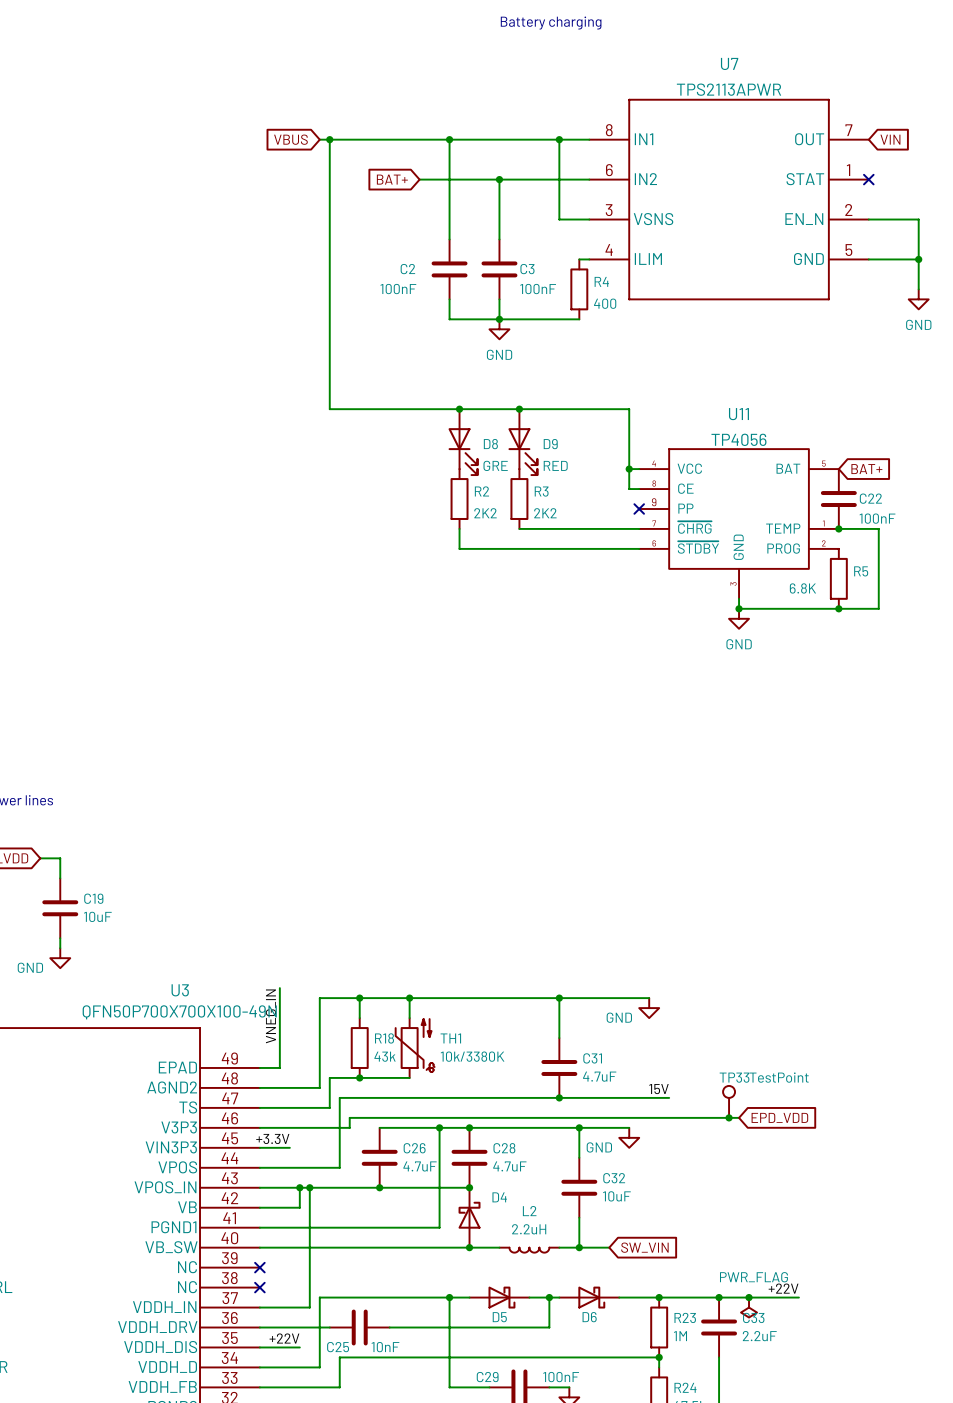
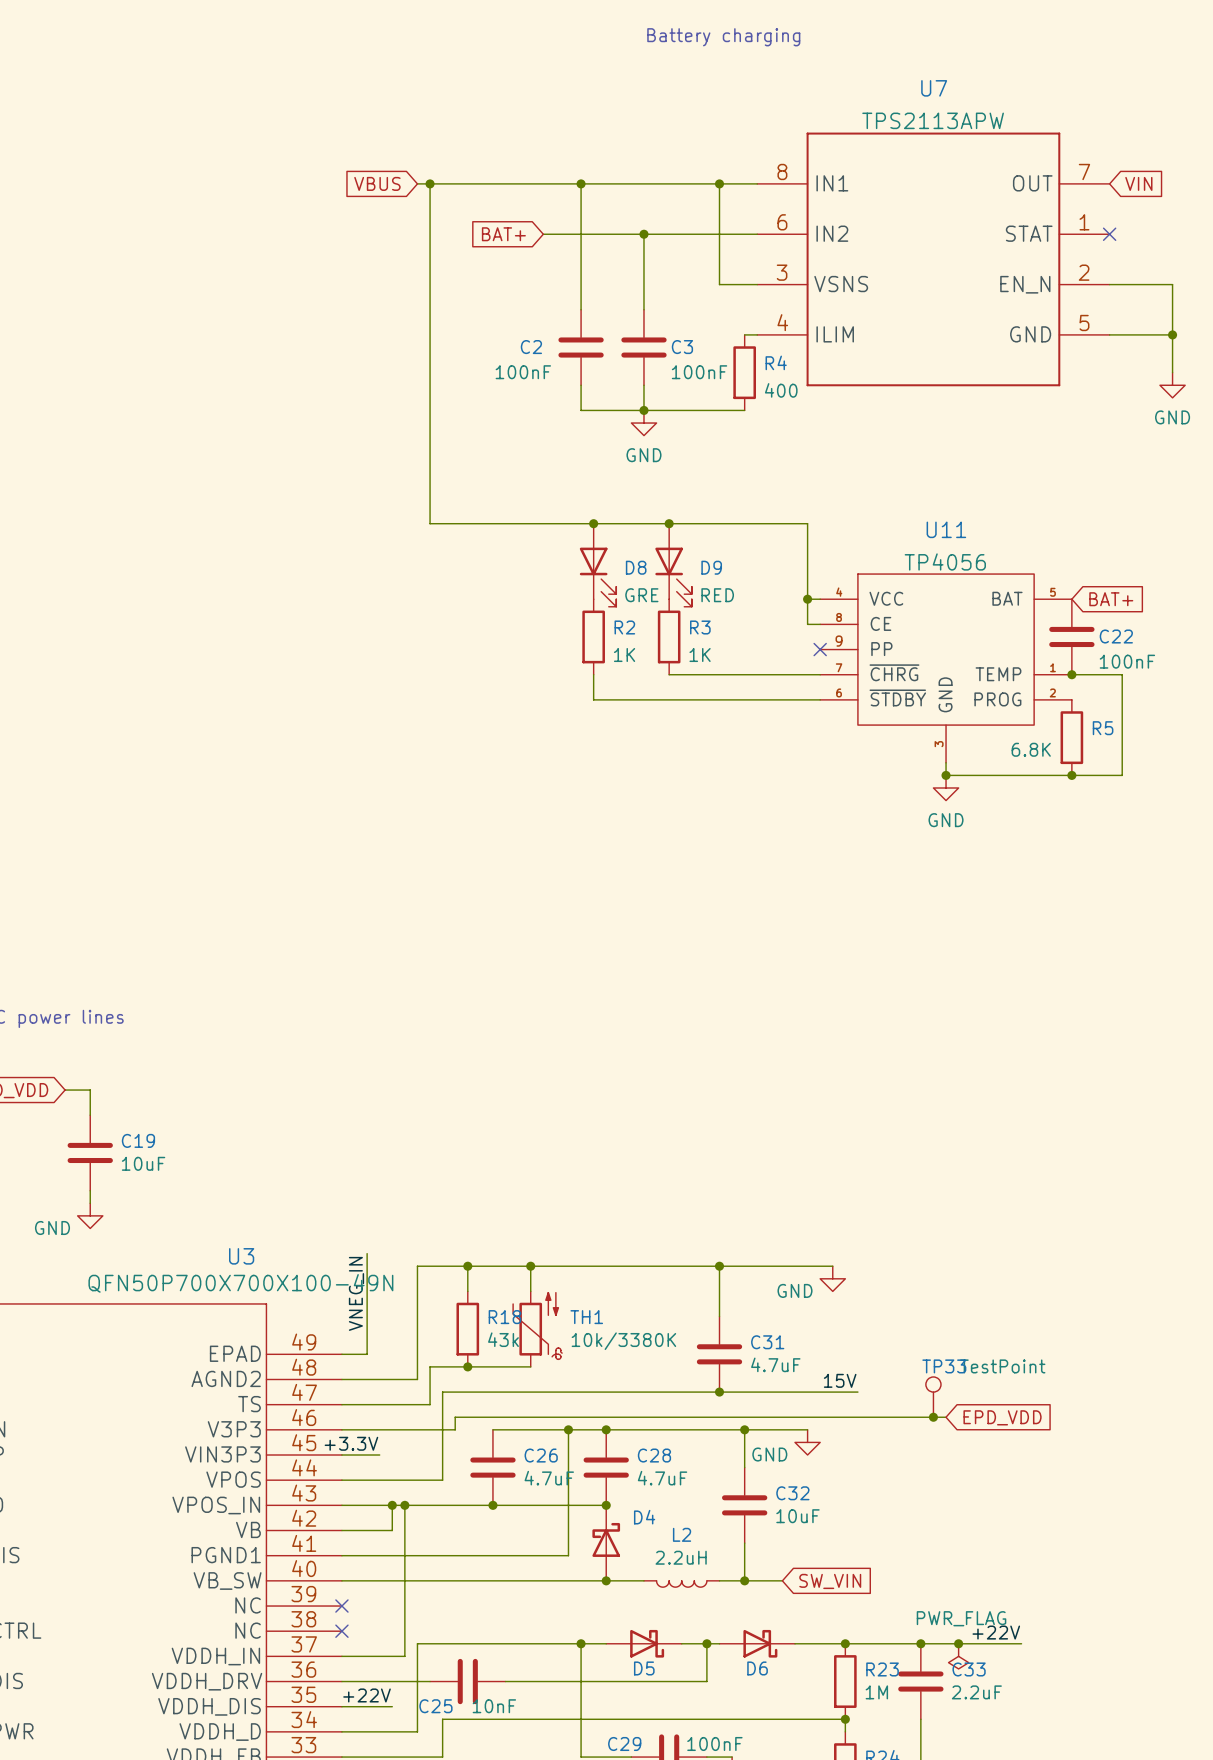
U7 value: TPS2113APWR (728, 89) -> TPS2113APW (933, 120)
R2 value: 2K2 (485, 513) -> 1K (624, 655)
R3 value: 2K2 (545, 513) -> 1K (700, 655)

